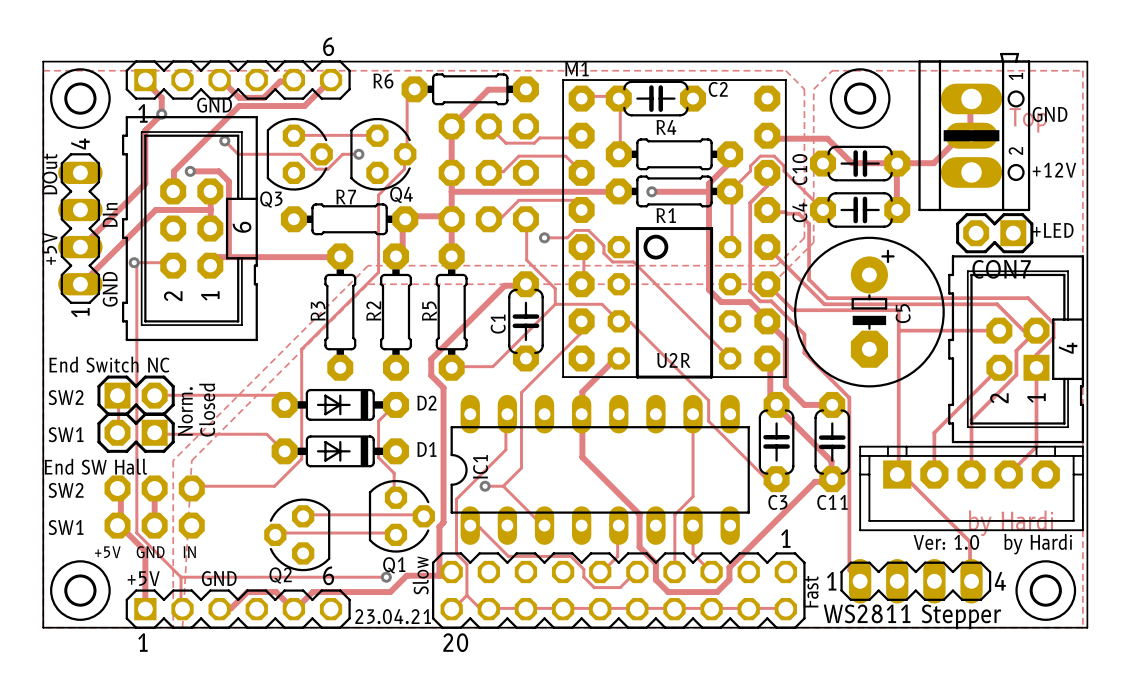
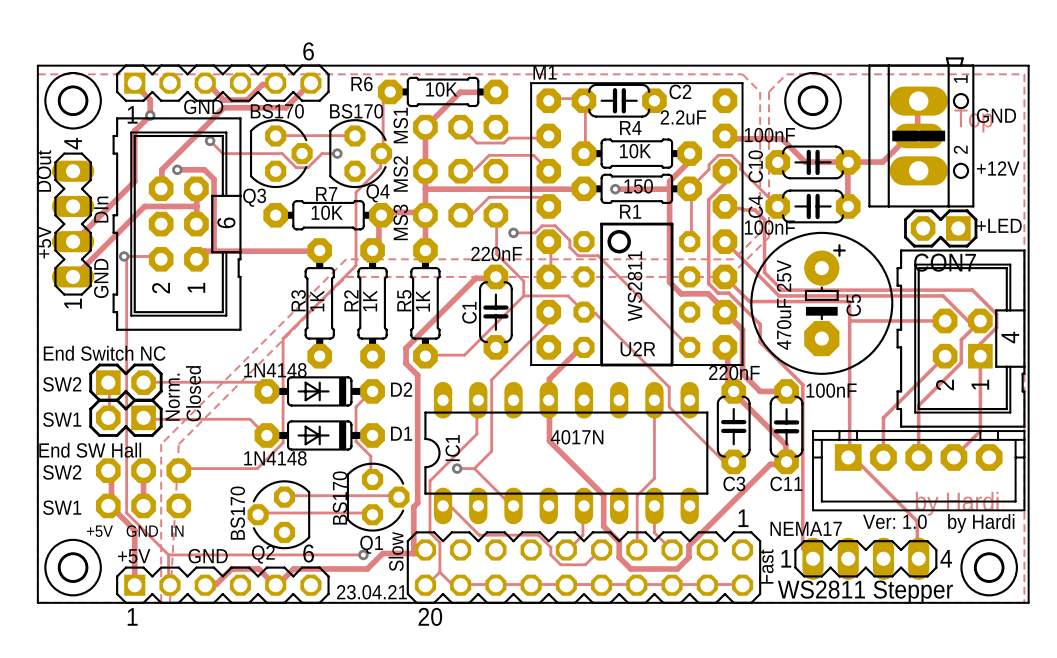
R6 value: none -> 10K (441, 89)
Q3 value: none -> BS170 (277, 111)
Q4 value: none -> BS170 (356, 111)
C2 value: none -> 2.2uF (683, 117)
part value: none -> MS1 (400, 125)
C10 value: none -> 100nF (769, 135)
R4 value: none -> 10K (635, 151)
part value: none -> MS2 (400, 173)
R1 value: none -> 150 (638, 186)
R7 value: none -> 10K (327, 212)
part value: none -> MS3 (400, 222)
C4 value: none -> 100nF (769, 227)
C1 value: none -> 220nF (496, 254)
U2R value: none -> WS2811 (635, 286)
R3 value: none -> 1K (317, 300)
R2 value: none -> 1K (370, 300)
R5 value: none -> 1K (422, 300)
C5 value: none -> 470uF 25V (784, 304)
D2 value: none -> 1N4148 (275, 370)
C3 value: none -> 220nF (734, 372)
C11 value: none -> 100nF (831, 390)
IC1 value: none -> 4017N (577, 437)
D1 value: none -> 1N4148 (275, 458)
Q1 value: none -> BS170 (339, 497)
Q2 value: none -> BS170 (237, 513)
part value: none -> NEMA17 (806, 528)

